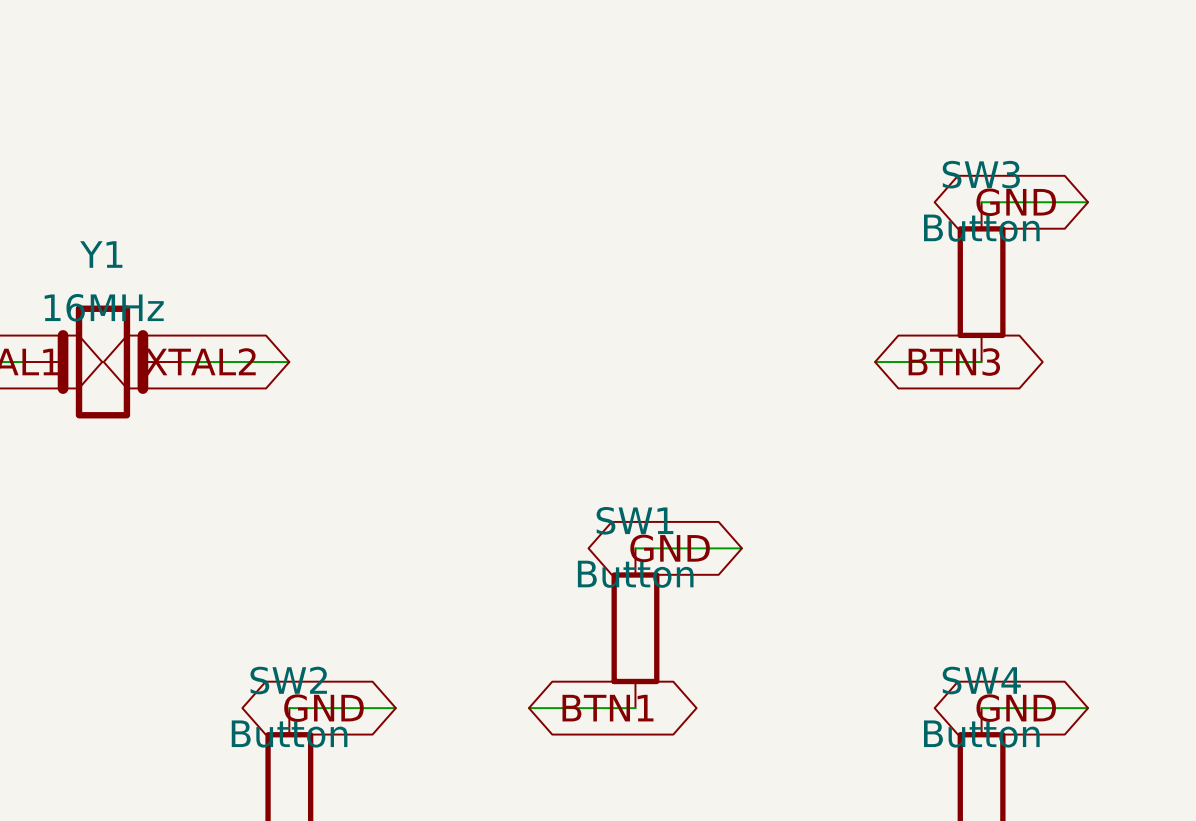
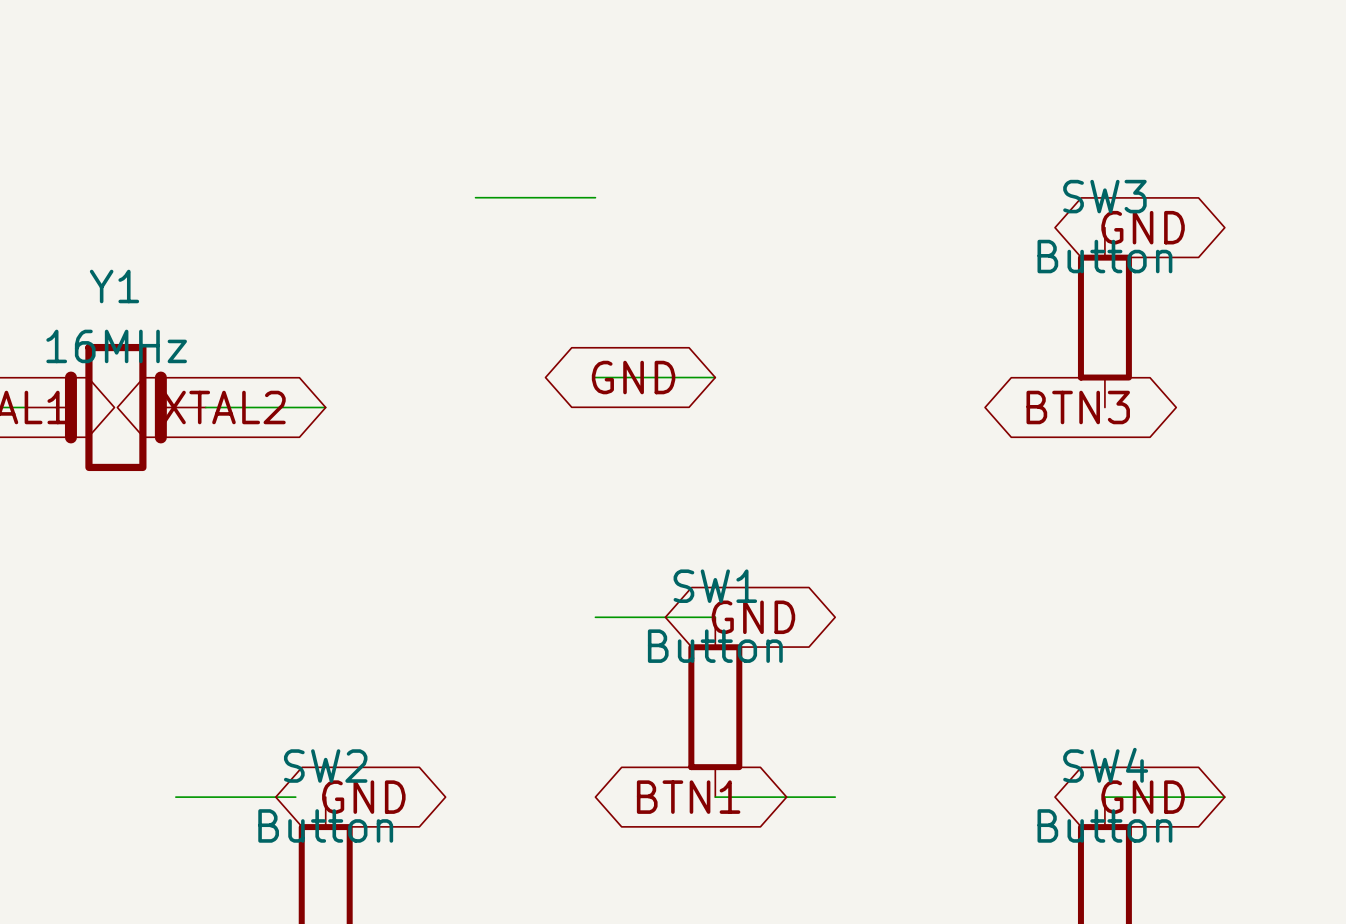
wire: none -> (475, 197) (595, 197)
wire: (981, 202) (1088, 202) -> none
global label: none -> GND (633, 377)
wire: (875, 362) (981, 362) -> (595, 377) (715, 377)
wire: (635, 548) (741, 548) -> (715, 617) (595, 617)
wire: (289, 708) (395, 708) -> (175, 797) (295, 797)
wire: (528, 708) (635, 708) -> (835, 797) (715, 797)

